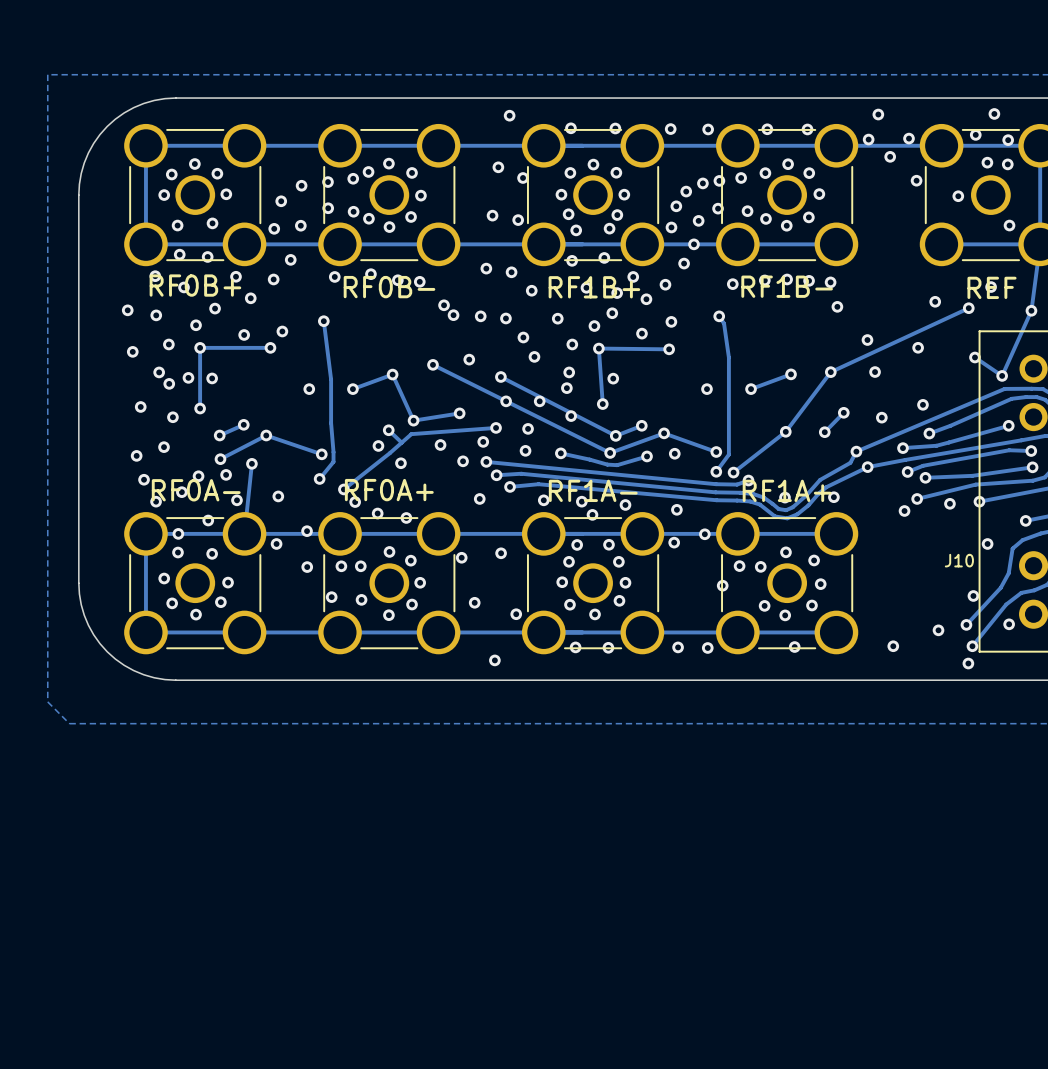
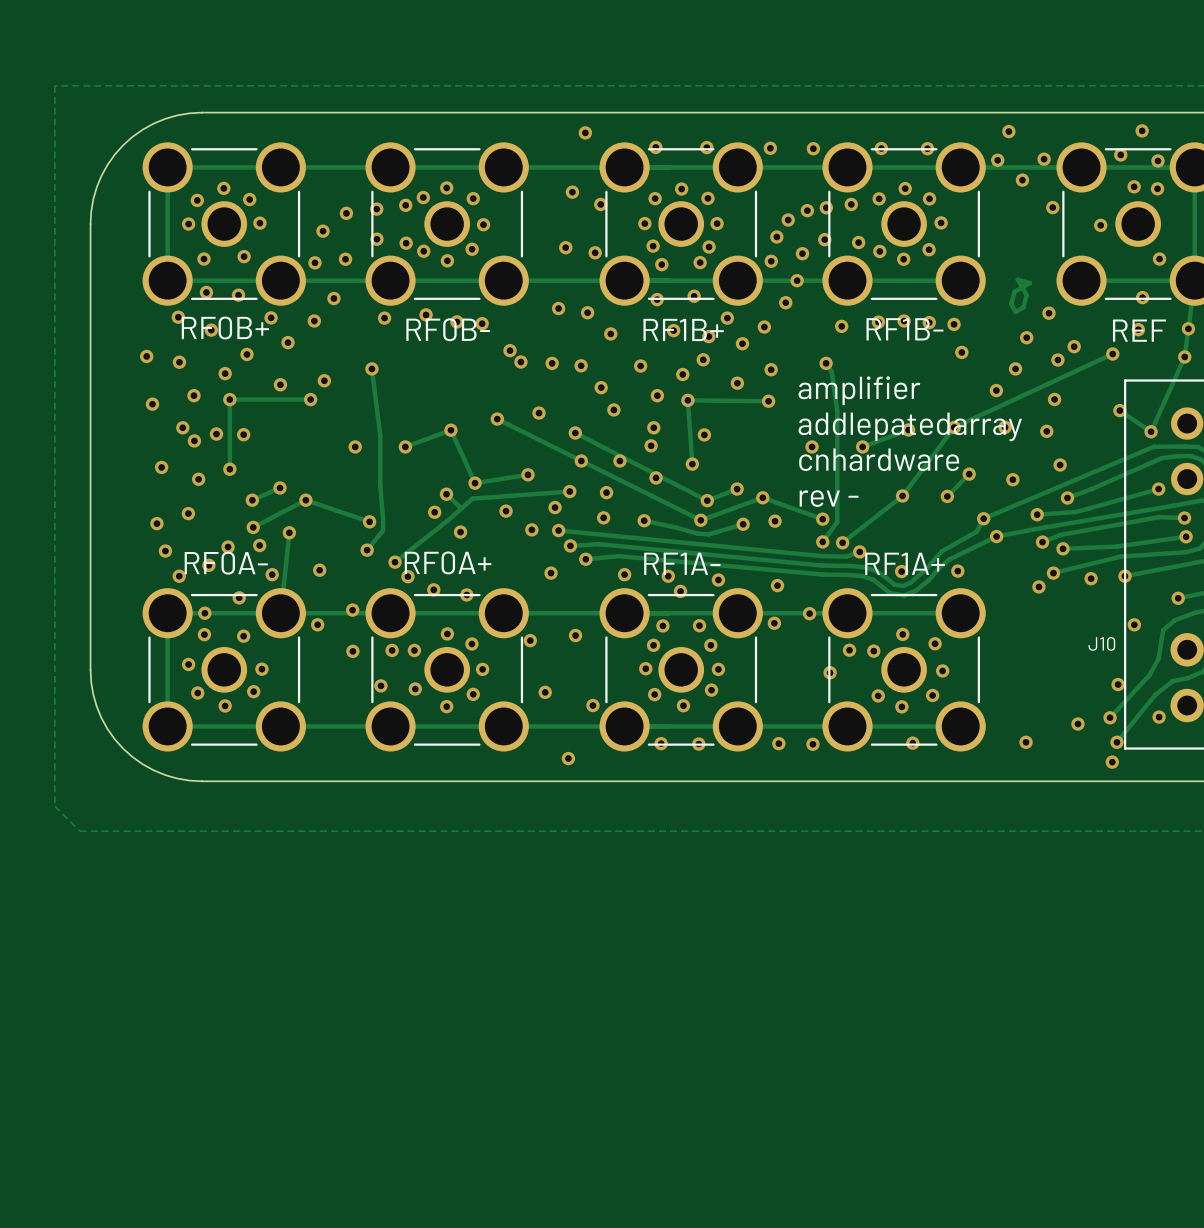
track: none -> (1017, 279) (1026, 295) (1023, 307) (1015, 311) (1011, 304) (1014, 291) (1029, 283) (1017, 279)
via: none -> (1142, 297)
via: none -> (1048, 313)
via: none -> (1188, 328)
via: none -> (1026, 337)
via: none -> (1057, 360)
via: none -> (1015, 368)
text: none -> amplifier (859, 390)
text: none -> addlepatedarray (910, 426)
via: none -> (1046, 431)
text: none -> cnhardware (879, 459)
text: none -> rev - (829, 498)

